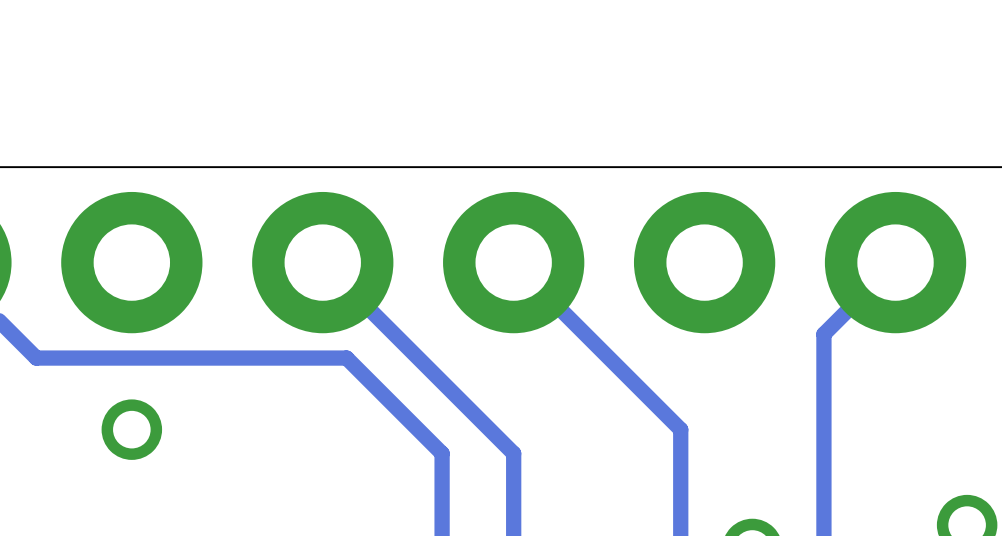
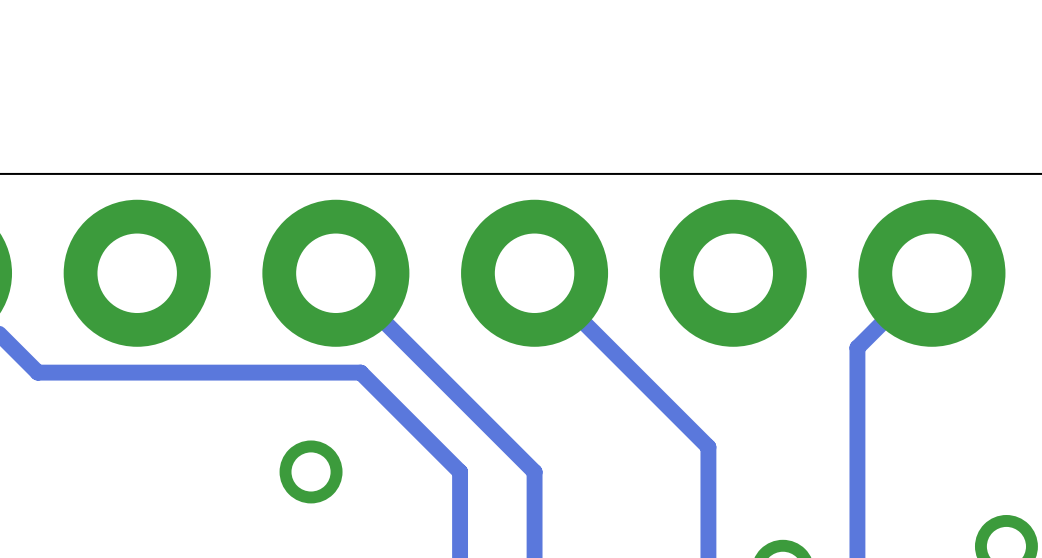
via: (131, 429) -> none
via: none -> (311, 471)

